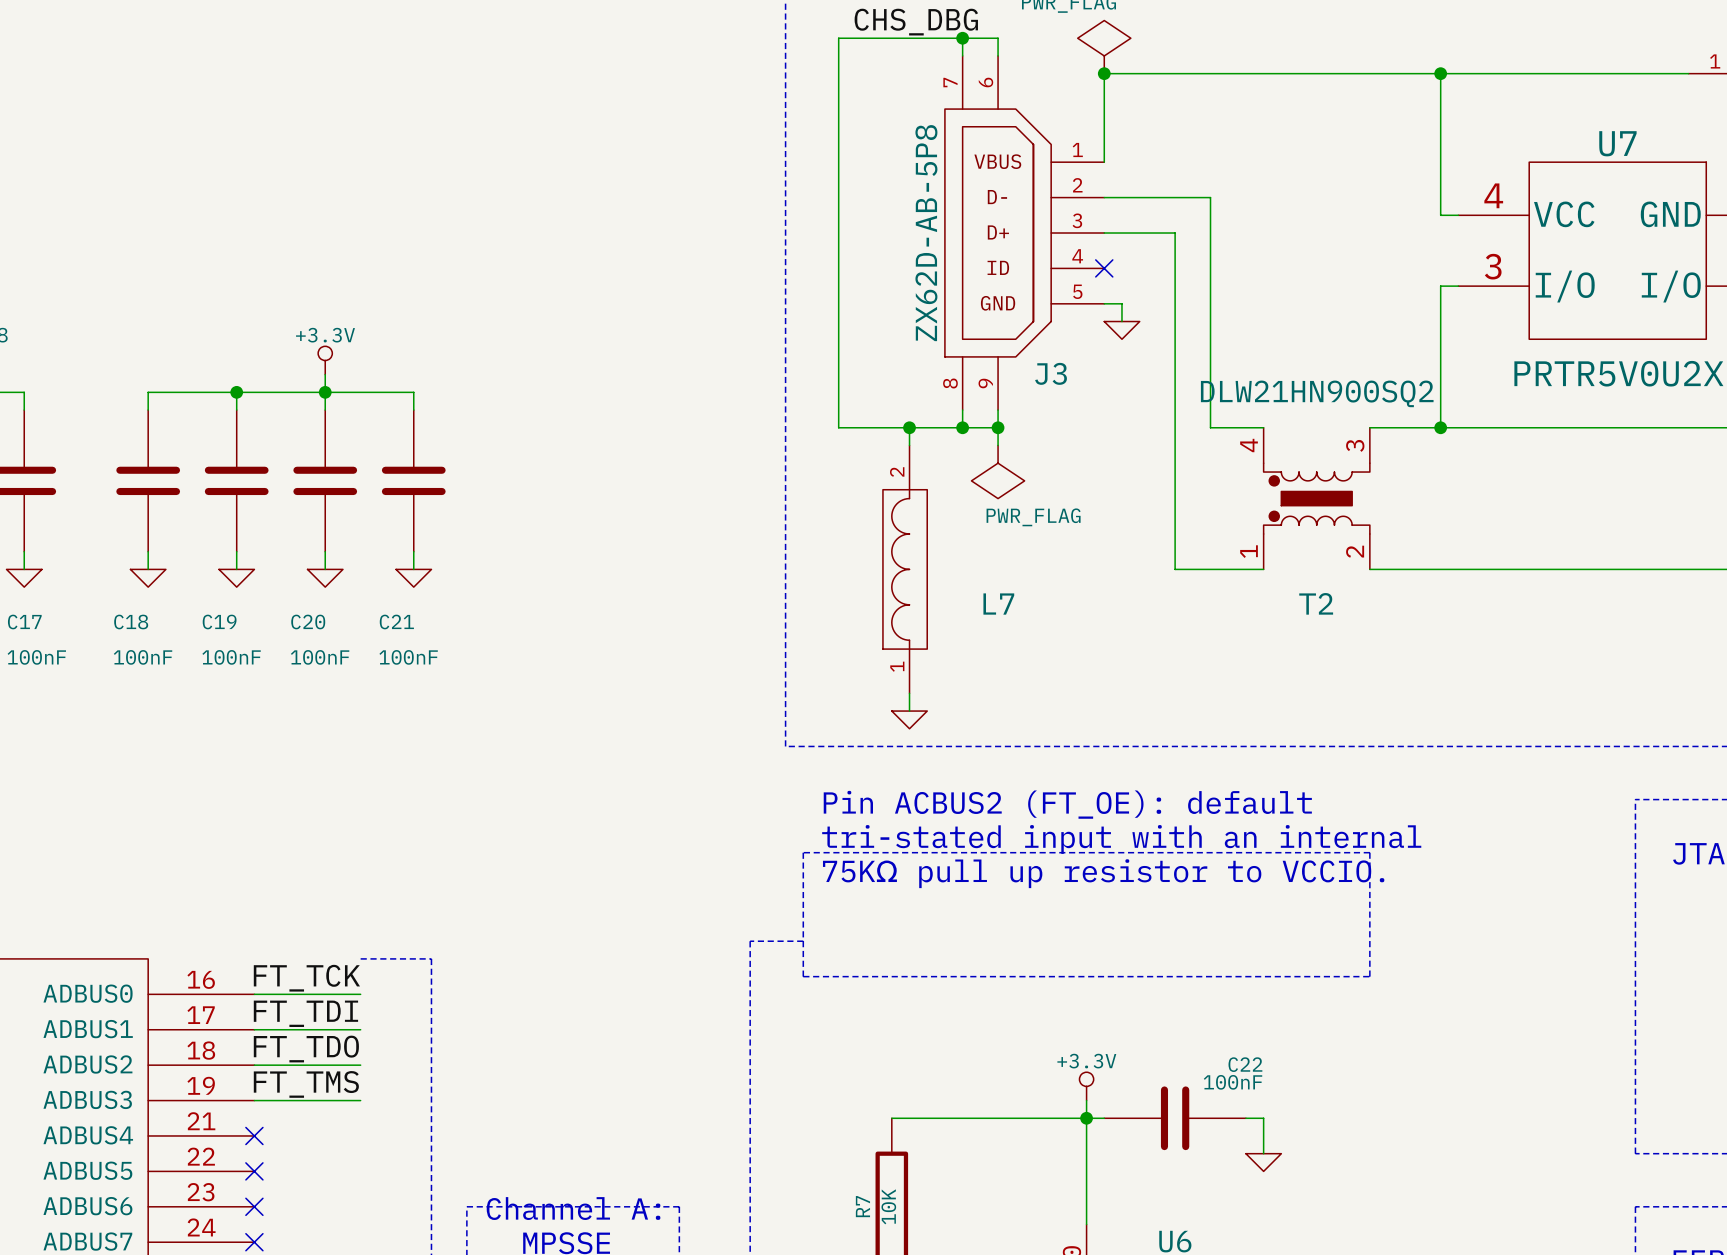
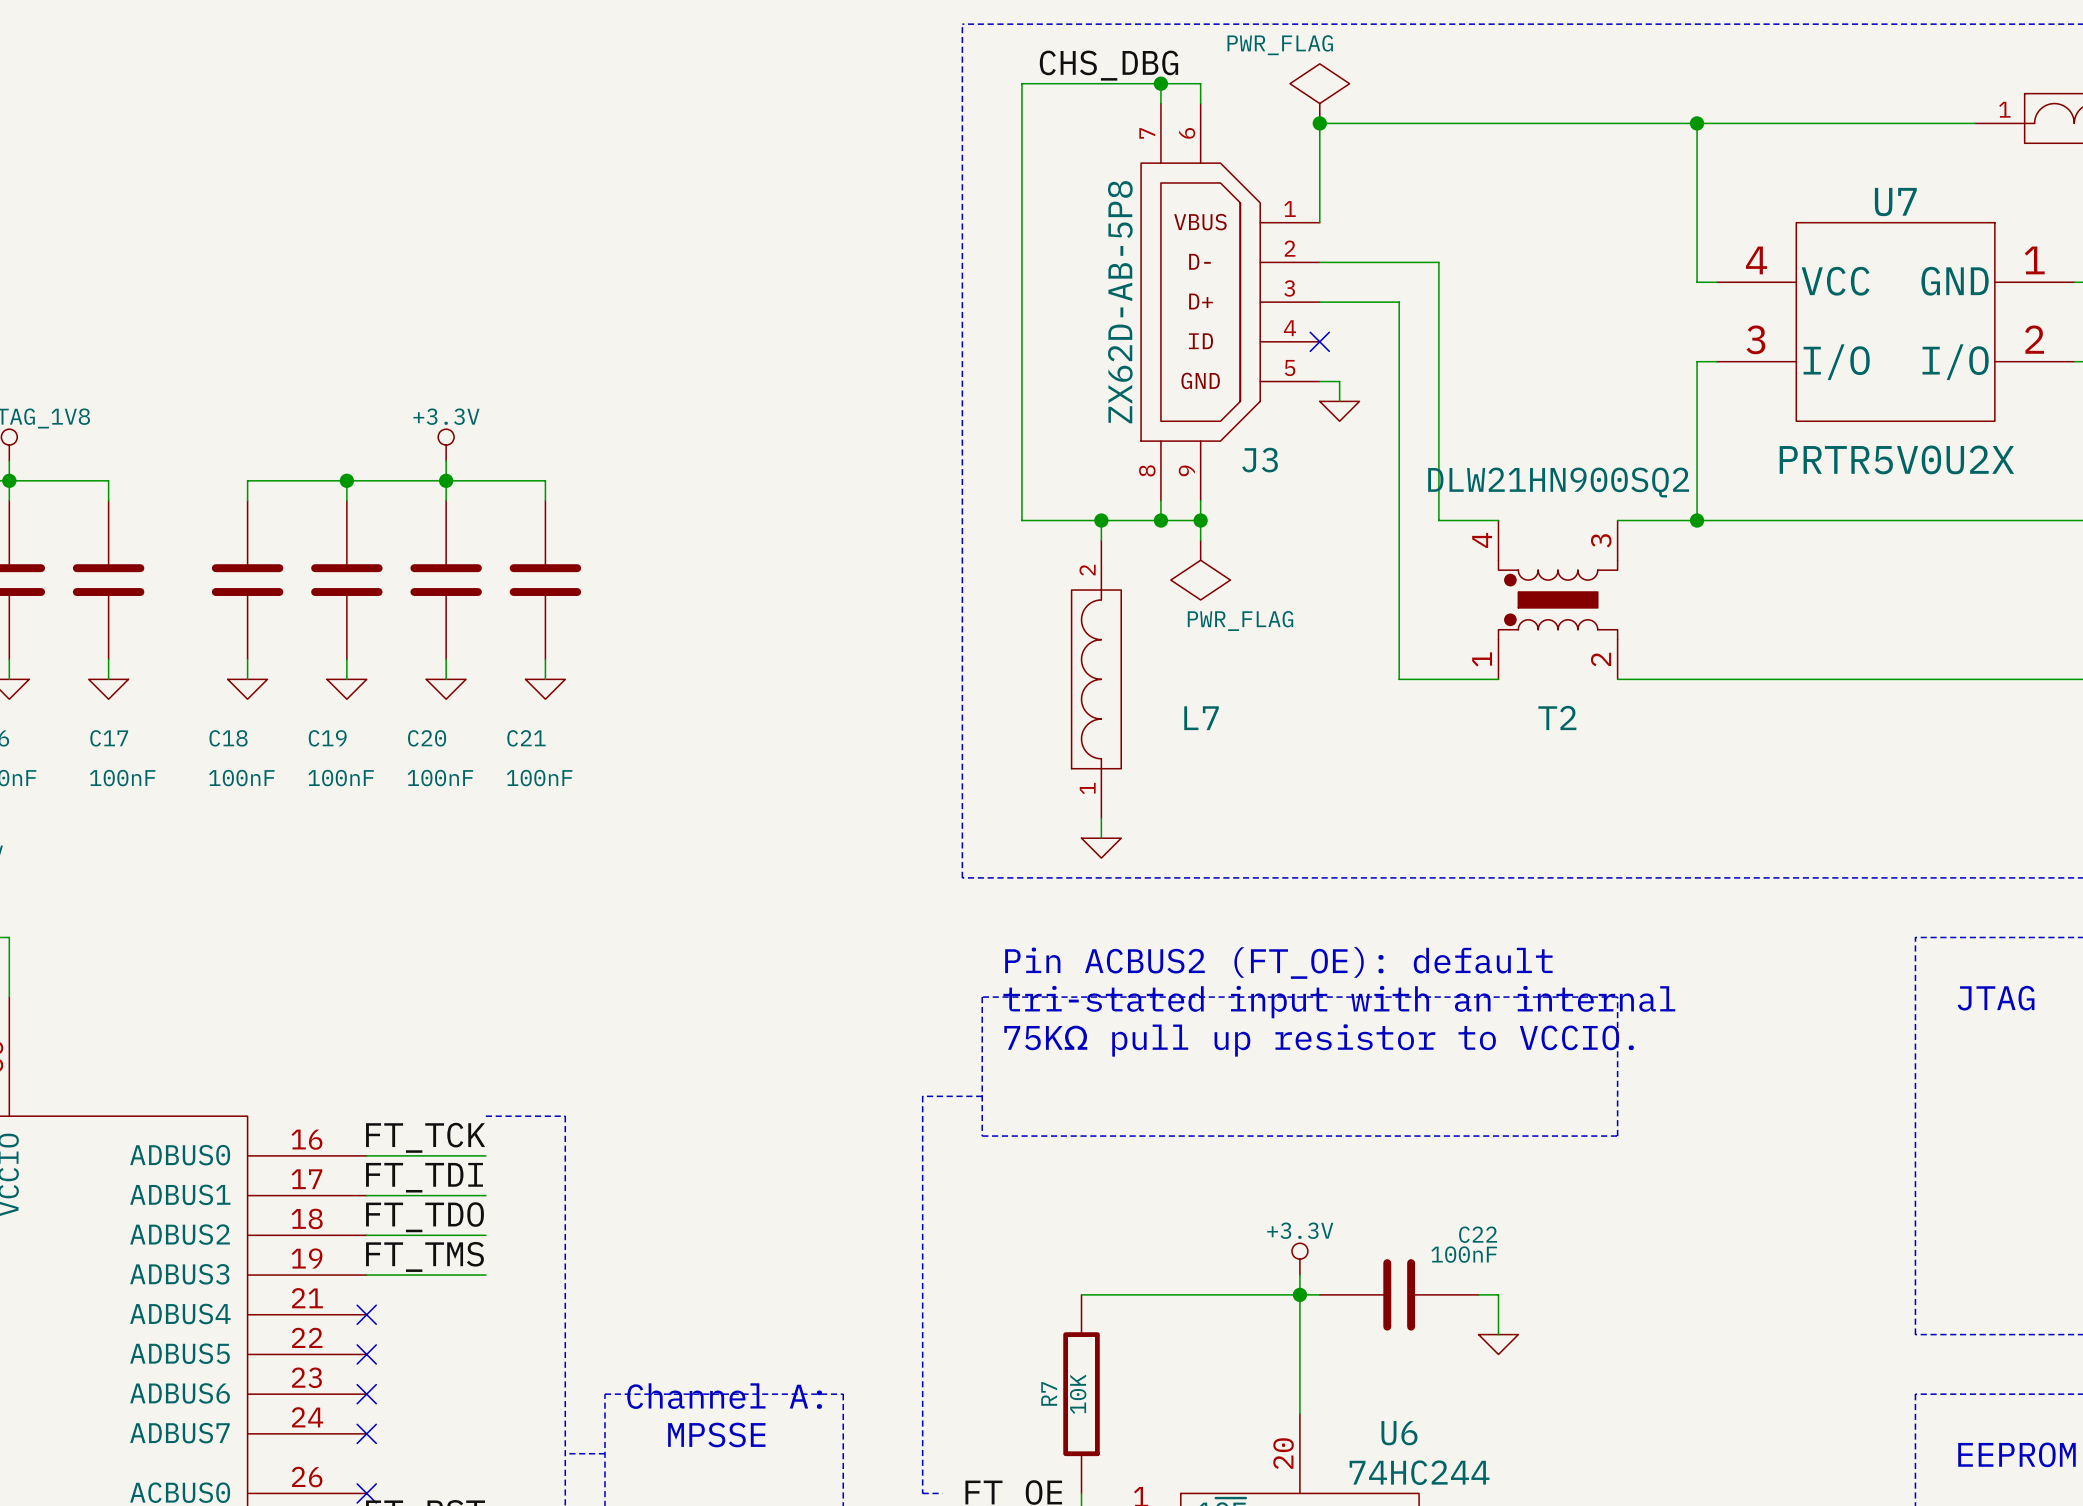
text position: Pin ACBUS2 (FT_OE): default (1067, 804) -> Pin ACBUS2 (FT_OE): default (1278, 962)
text position: tri-stated input with an internal (1121, 839) -> tri-stated input with an internal (1339, 1002)
text position: 75KΩ pull up resistor to VCCIO. (1103, 873) -> 75KΩ pull up resistor to VCCIO. (1319, 1040)

